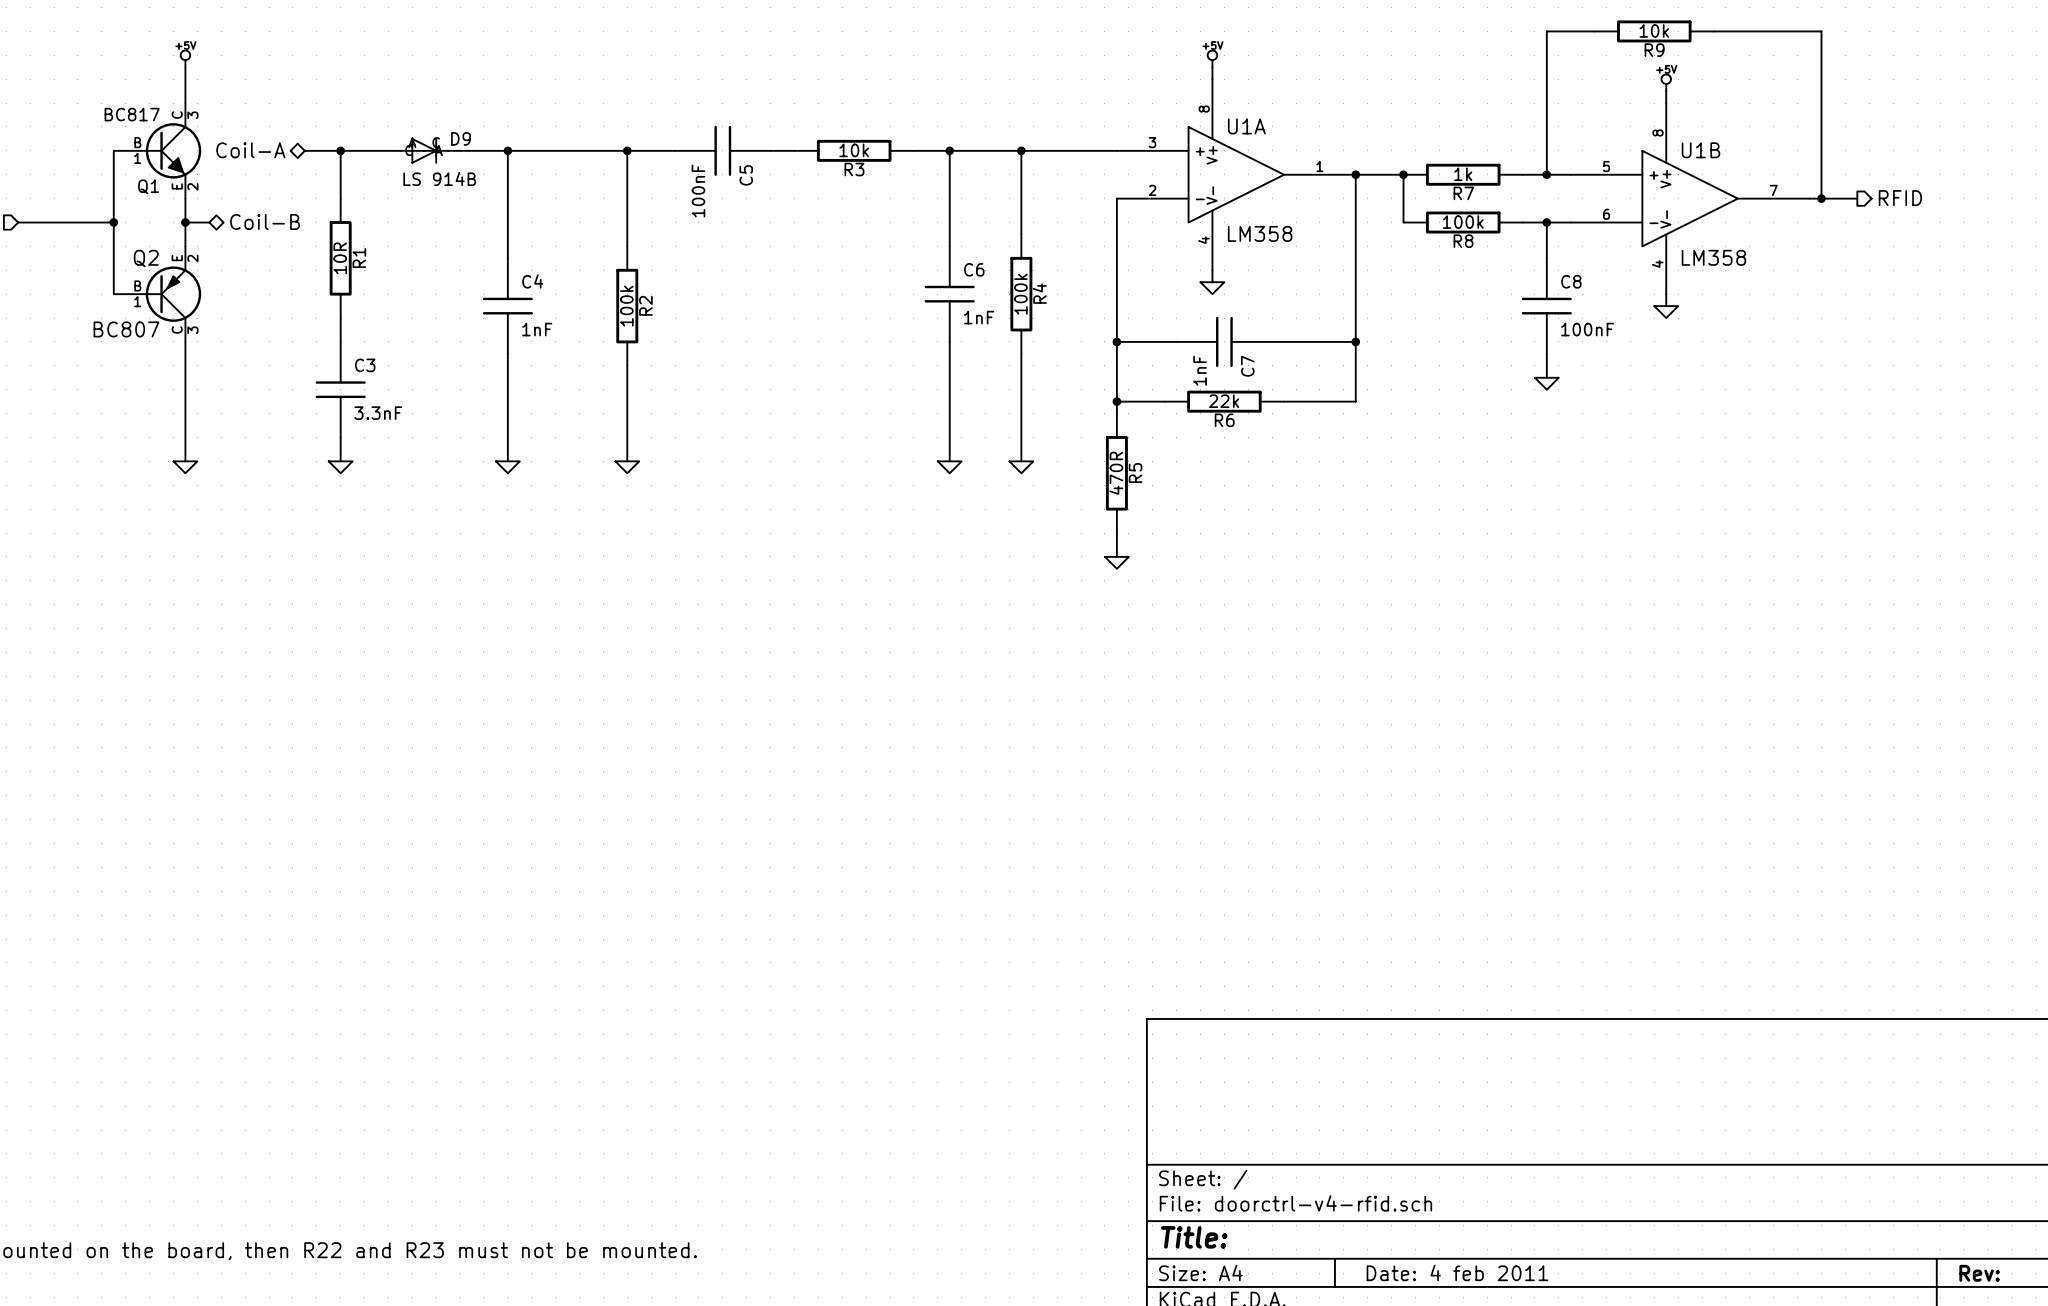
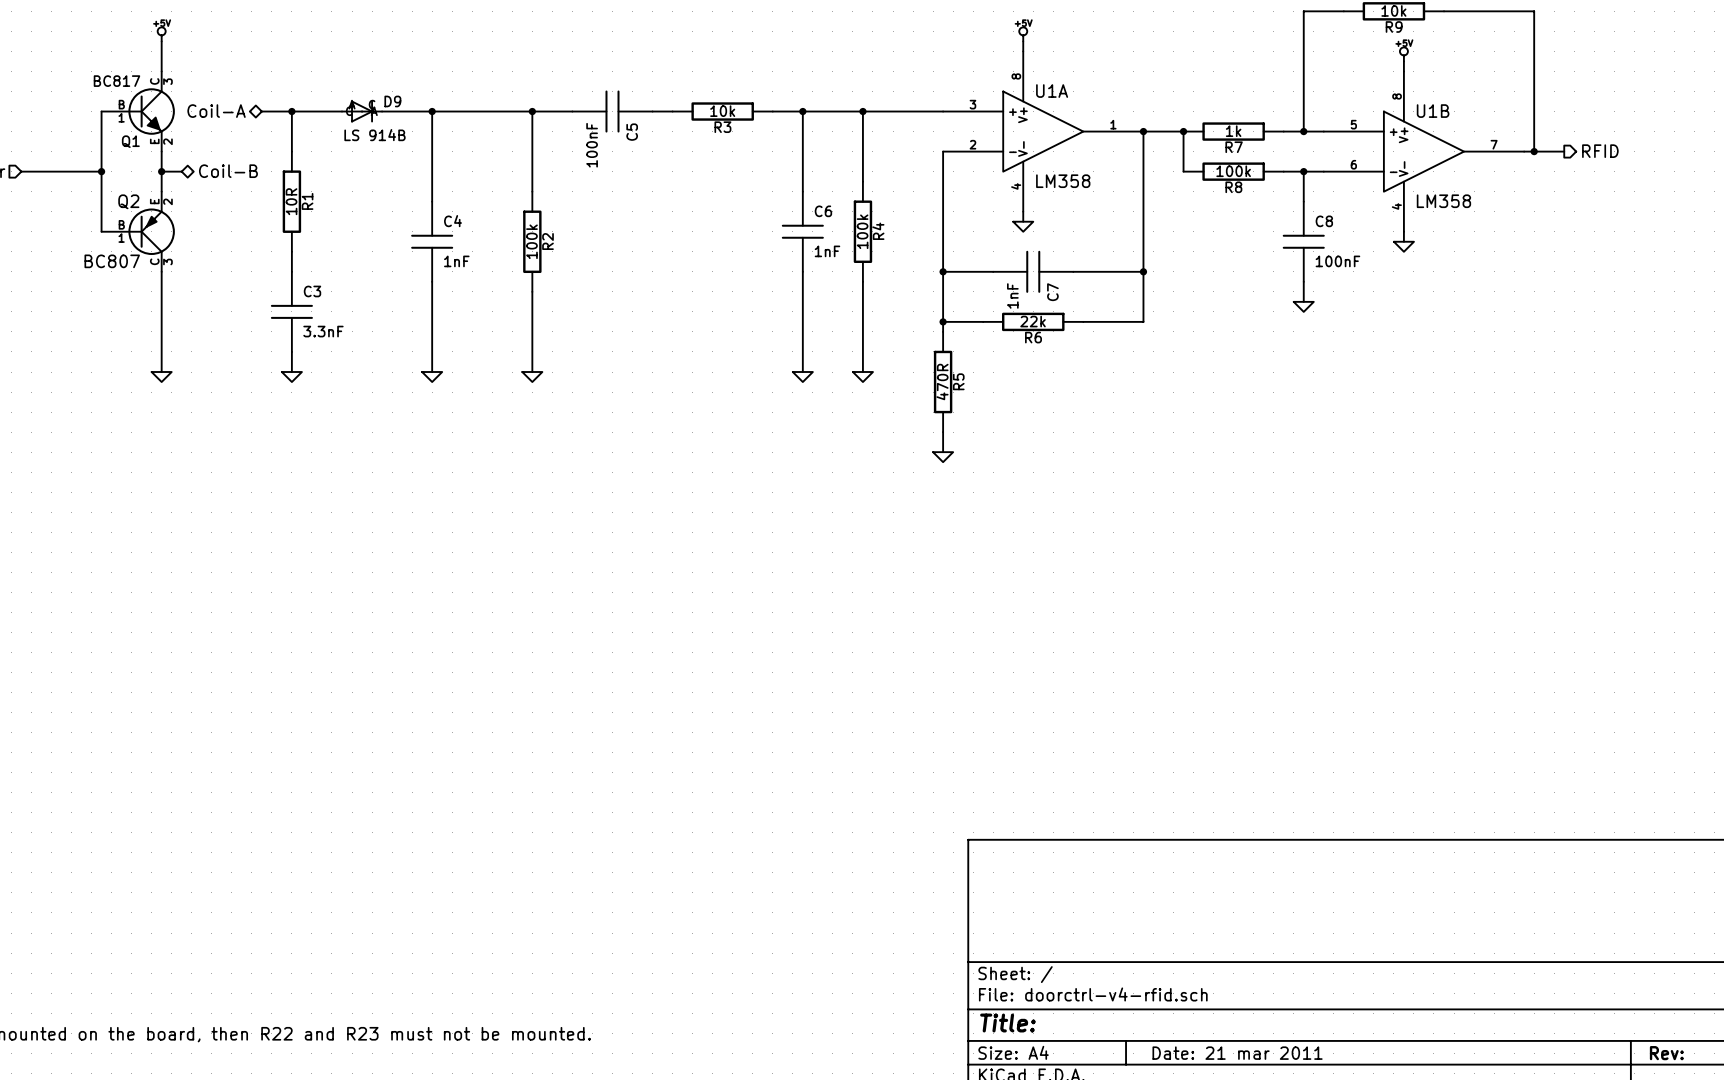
title block: Date: 4 feb 2011 (1457, 1272) -> Date: 21 mar 2011 (1237, 1053)

